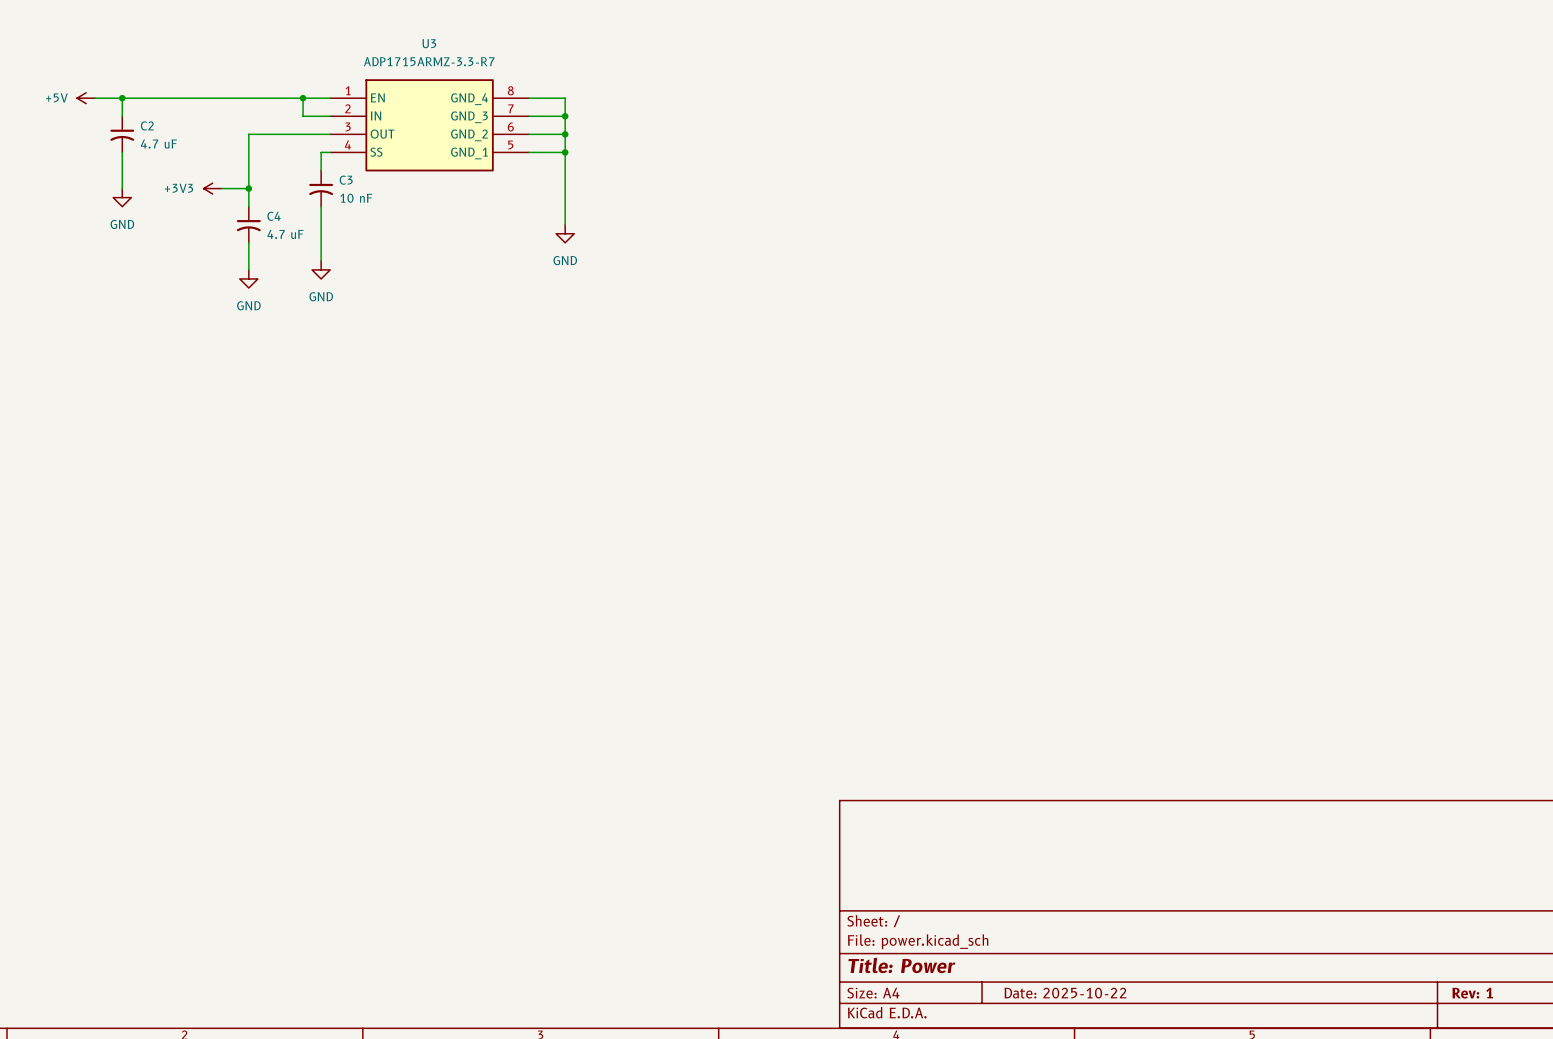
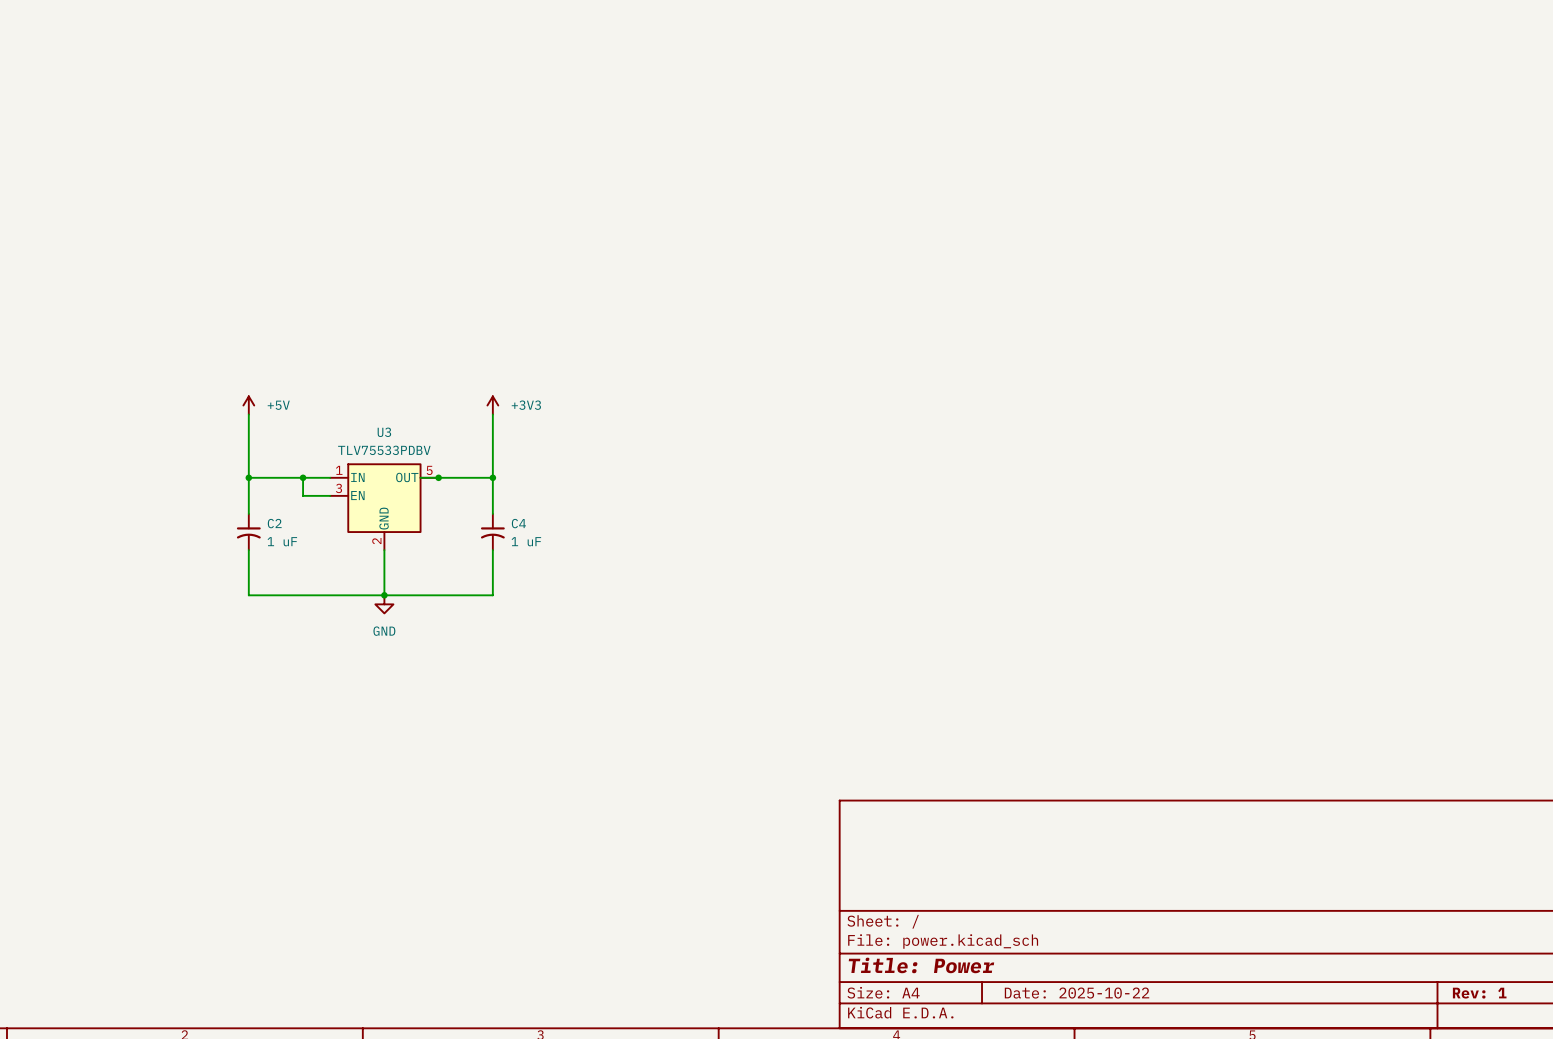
U3 value: ADP1715ARMZ-3.3-R7 (429, 61) -> TLV75533PDBV (384, 450)
U3 symbol: [330, 79, 530, 172] -> [330, 463, 439, 551]
power symbol: +5V (86, 98) -> none
wire: (95, 98) (330, 98) -> none
wire: (122, 98) (122, 116) -> none
junction: (122, 98) -> none
wire: (303, 98) (303, 116) (330, 116) -> none
junction: (303, 98) -> none
wire: (529, 98) (565, 98) (565, 224) -> none
wire: (529, 116) (565, 116) -> none
junction: (565, 116) -> none
C2 position: (122, 134) -> (248, 532)
wire: (330, 134) (248, 134) (248, 206) -> none
wire: (529, 134) (565, 134) -> none
junction: (565, 134) -> none
C2 value: 4.7 uF (158, 144) -> 1 uF (282, 541)
wire: (122, 152) (122, 188) -> none
wire: (330, 152) (321, 152) (321, 170) -> none
wire: (529, 152) (565, 152) -> none
junction: (565, 152) -> none
power symbol: +3V3 (212, 188) -> none
wire: (221, 188) (248, 188) -> none
junction: (248, 188) -> none
C3: 10 nF (321, 188) -> none
power symbol: GND (122, 197) -> none
wire: (321, 206) (321, 260) -> none
C4 position: (248, 224) -> (492, 532)
power symbol: GND (565, 233) -> none
C4 value: 4.7 uF (285, 234) -> 1 uF (526, 541)
wire: (248, 242) (248, 269) -> none
power symbol: GND (321, 269) -> none
power symbol: GND (248, 278) -> none
power symbol: none -> +5V (248, 405)
power symbol: none -> +3V3 (492, 405)
wire: none -> (248, 414) (248, 513)
wire: none -> (492, 414) (492, 513)
wire: none -> (248, 477) (330, 477)
junction: none -> (248, 477)
wire: none -> (303, 477) (303, 495) (330, 495)
junction: none -> (303, 477)
wire: none -> (420, 477) (492, 477)
junction: none -> (438, 477)
junction: none -> (492, 477)
wire: none -> (248, 550) (248, 595) (492, 595) (492, 550)
wire: none -> (384, 550) (384, 595)
junction: none -> (384, 595)
power symbol: none -> GND (384, 604)

